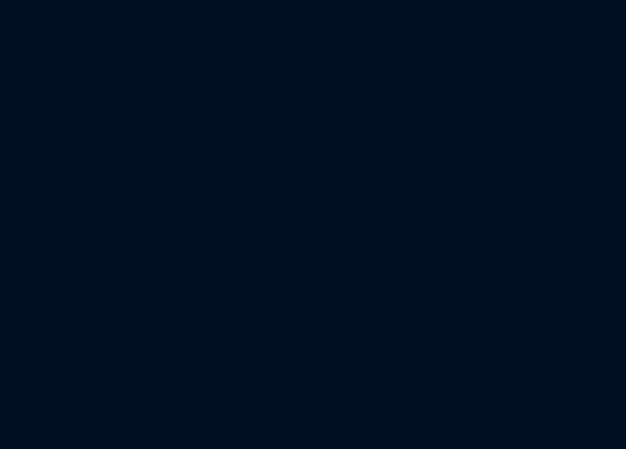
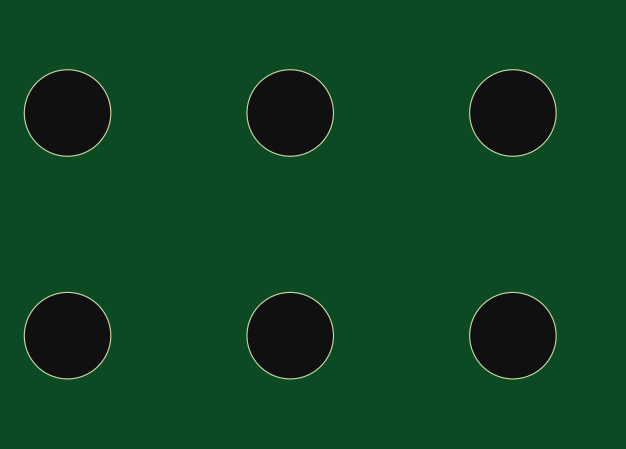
part: none -> (67, 112)
part: none -> (290, 112)
part: none -> (512, 112)
part: none -> (67, 335)
part: none -> (290, 335)
part: none -> (512, 335)

